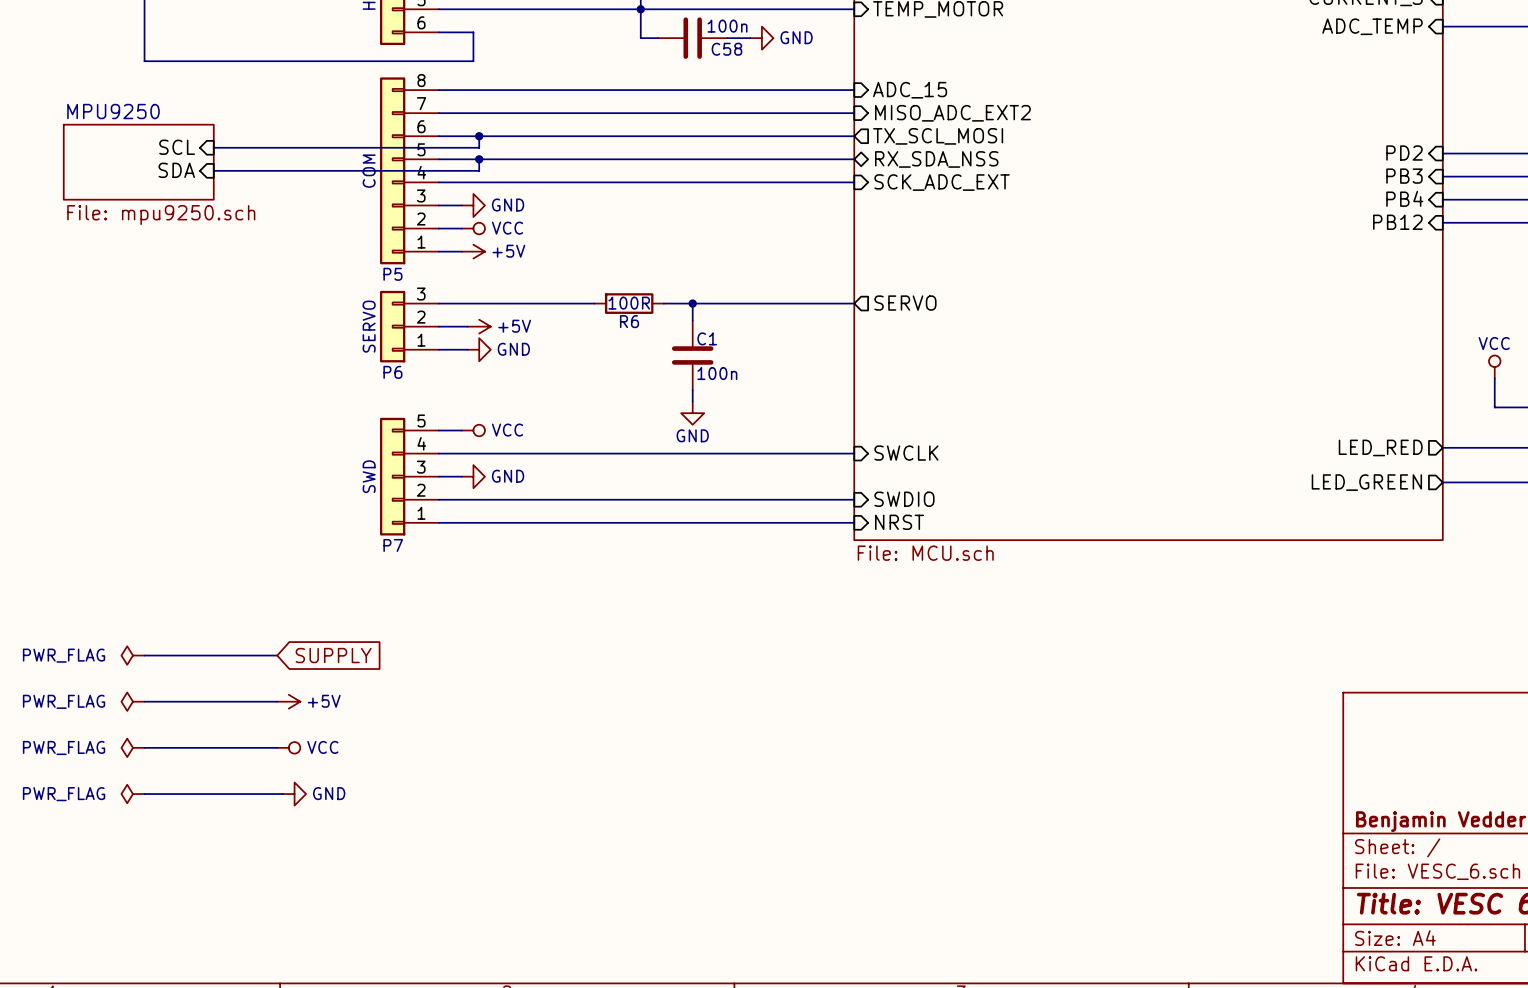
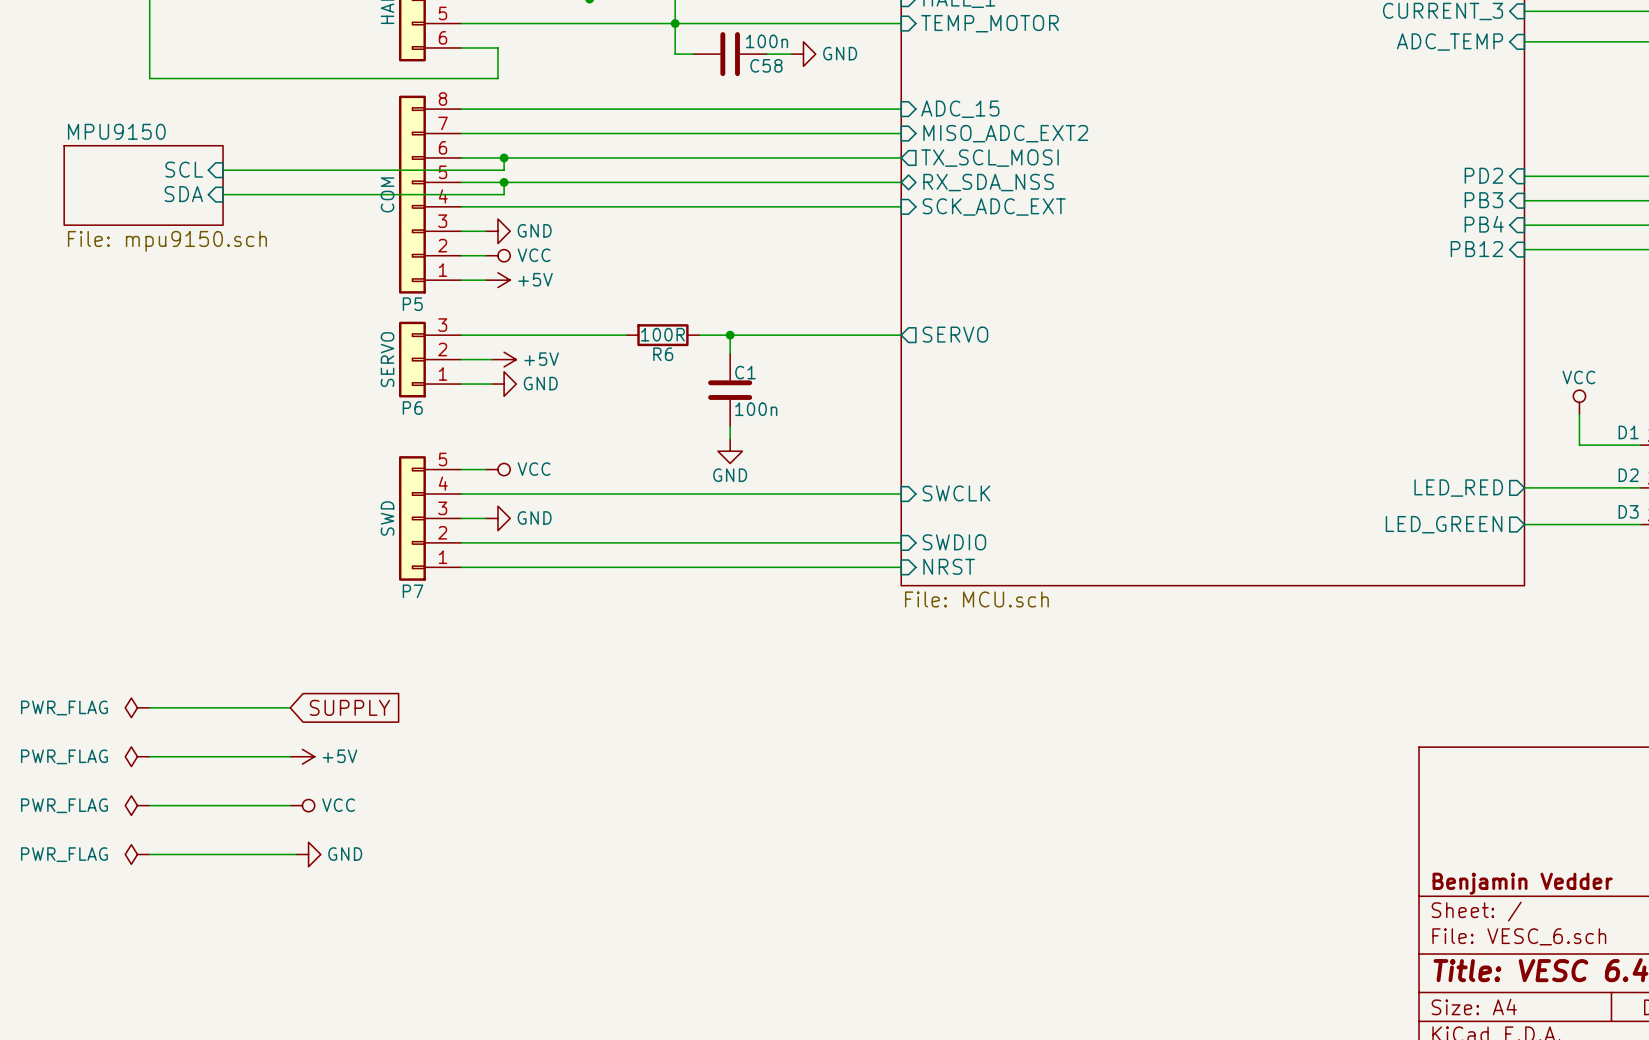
sheet MPU9250 name: MPU9250 (113, 111) -> MPU9150 (116, 131)
sheet MPU9250 value: File: mpu9250.sch (161, 215) -> File: mpu9150.sch (167, 241)

